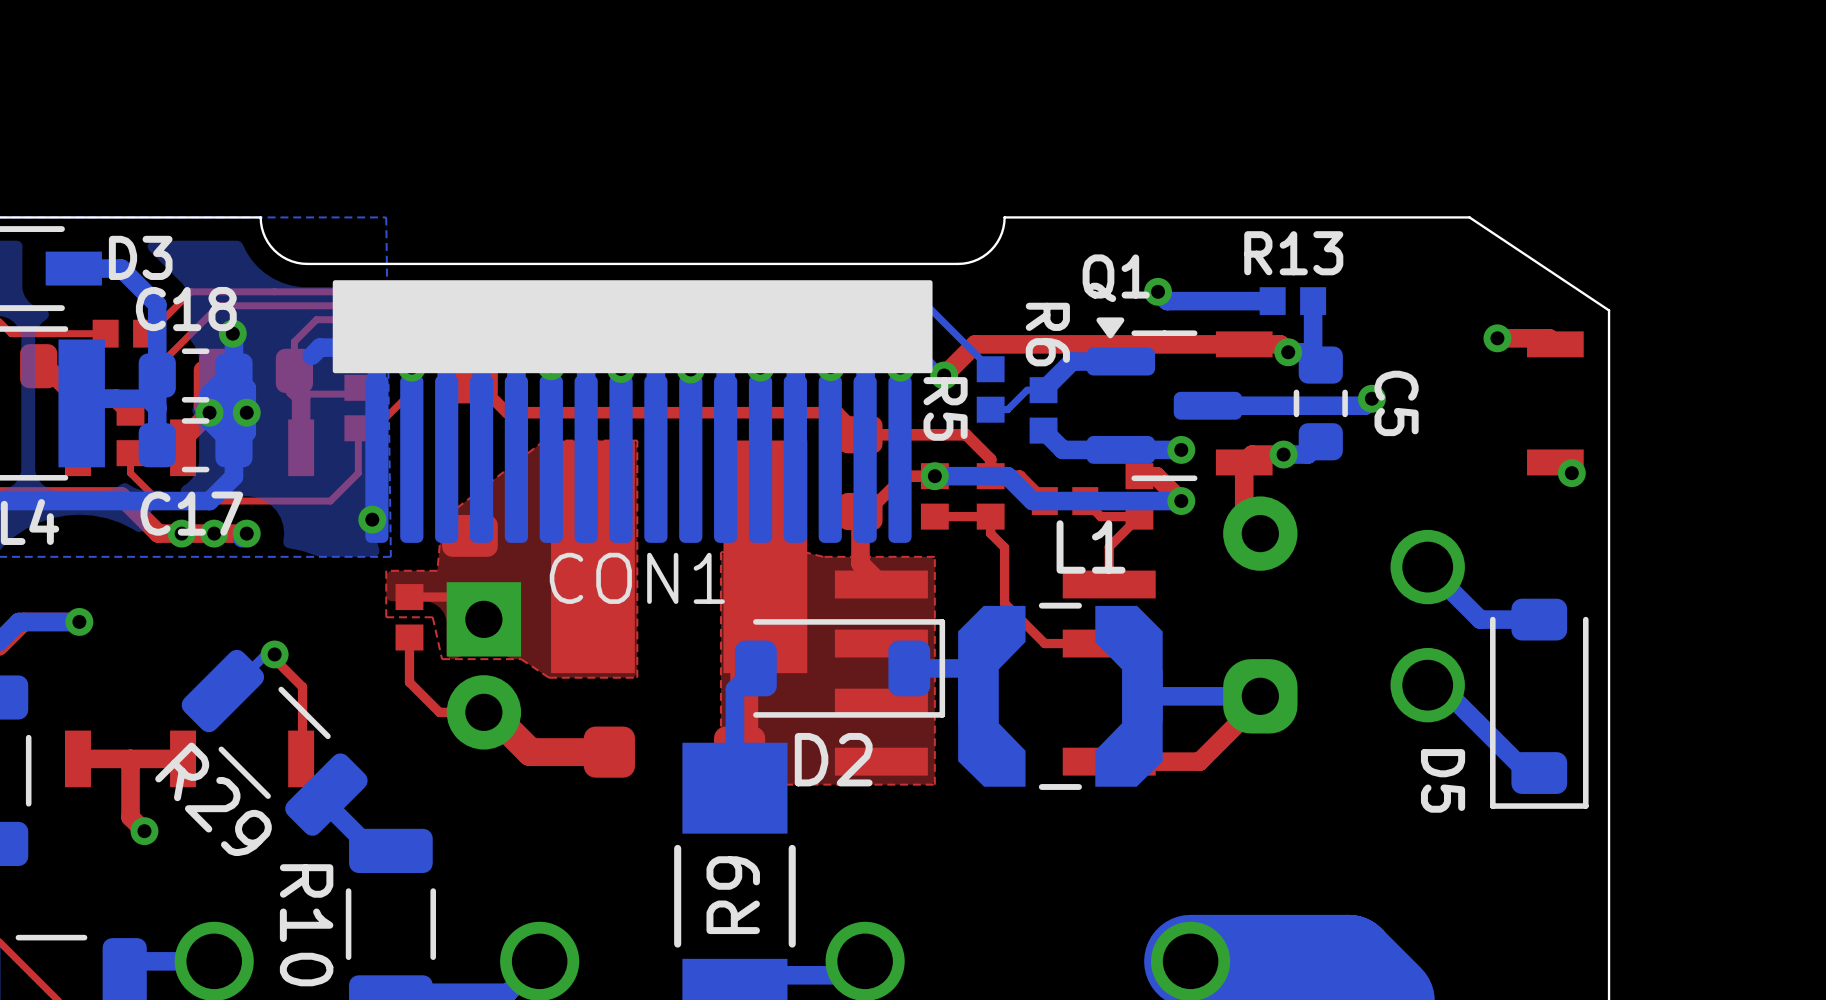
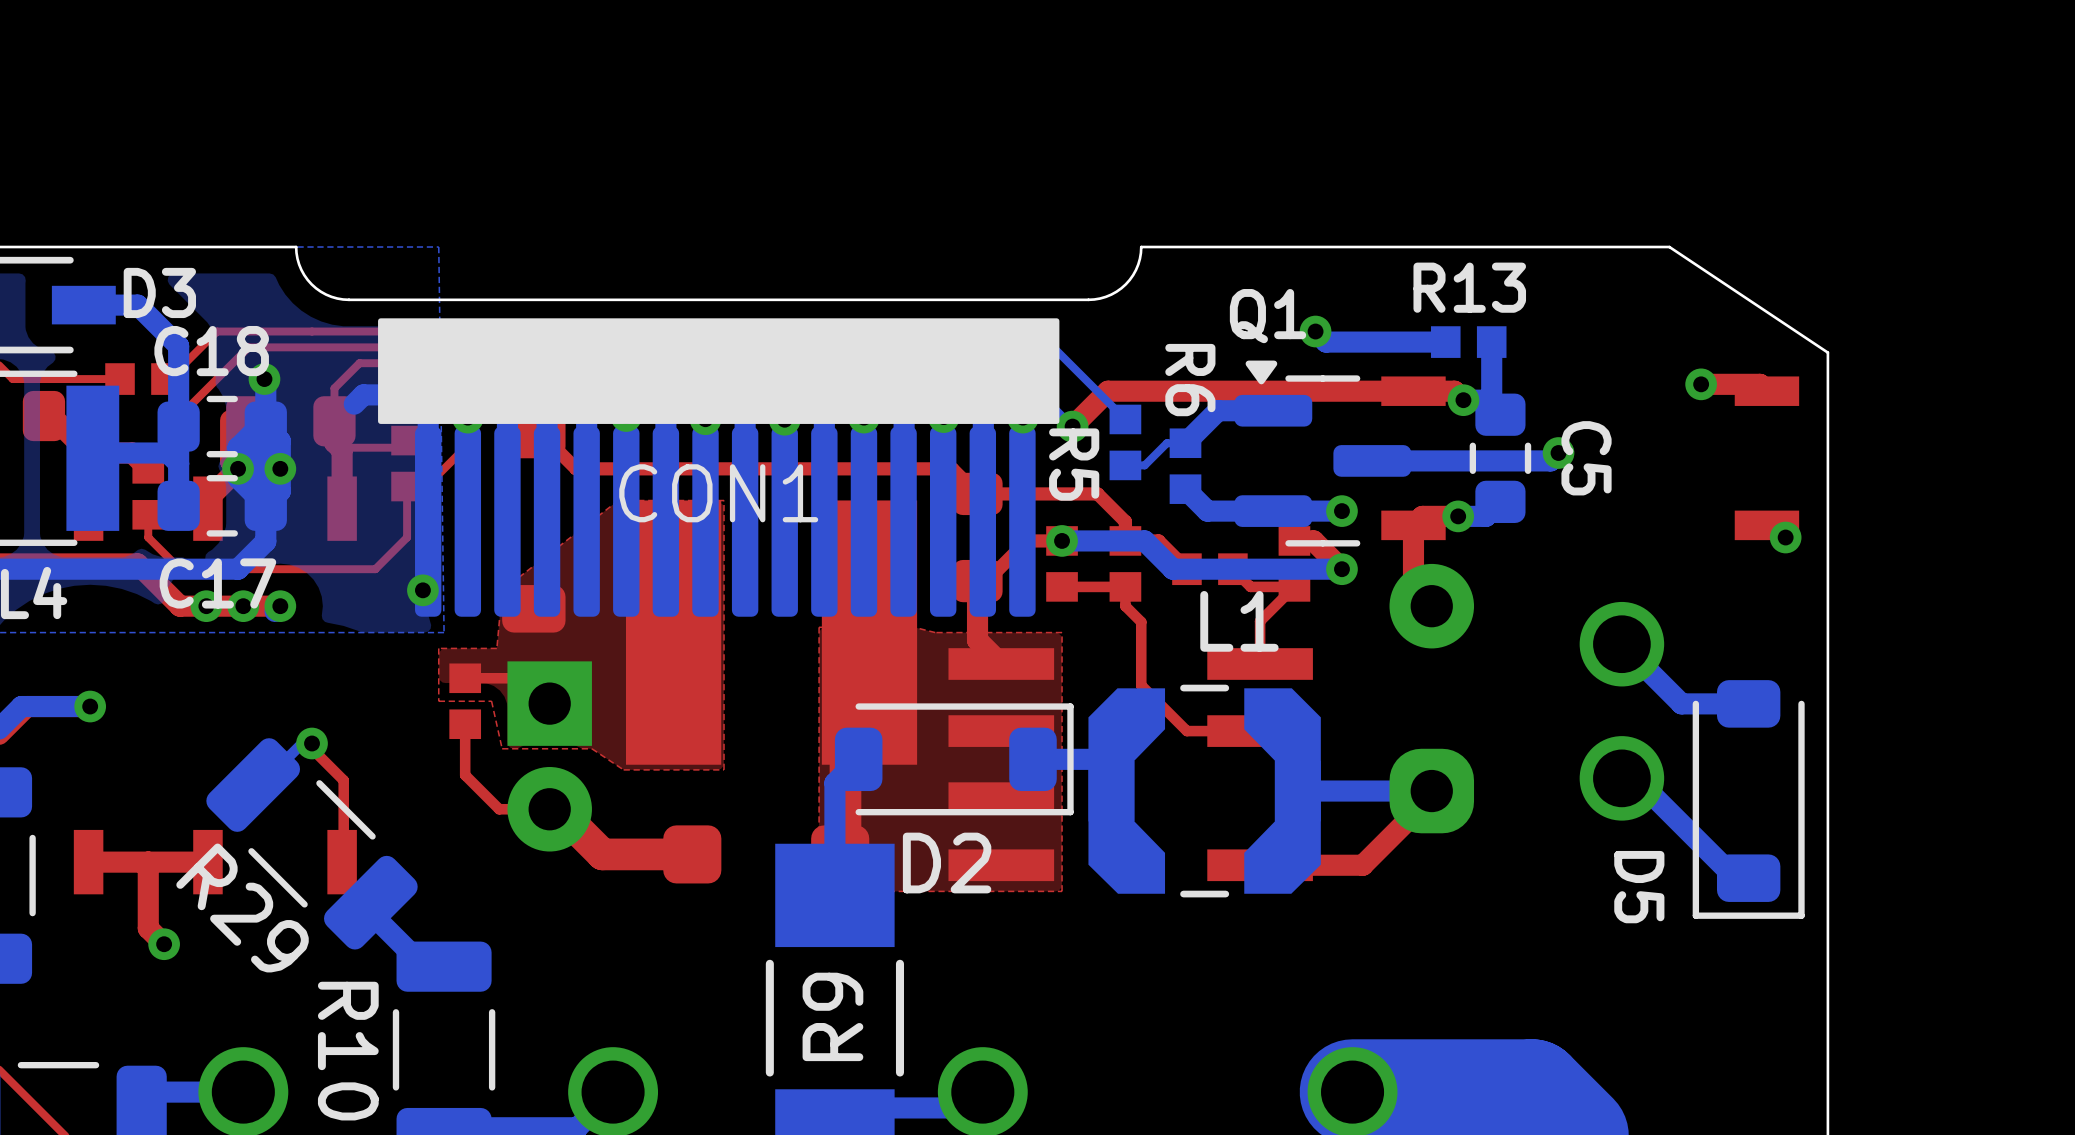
CON1 name position: CON1 (637, 578) -> CON1 (718, 493)

